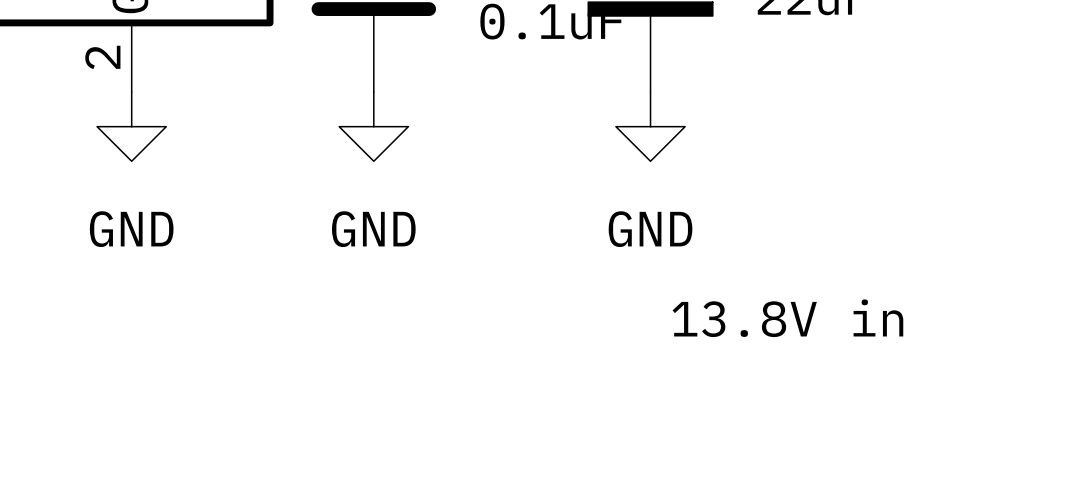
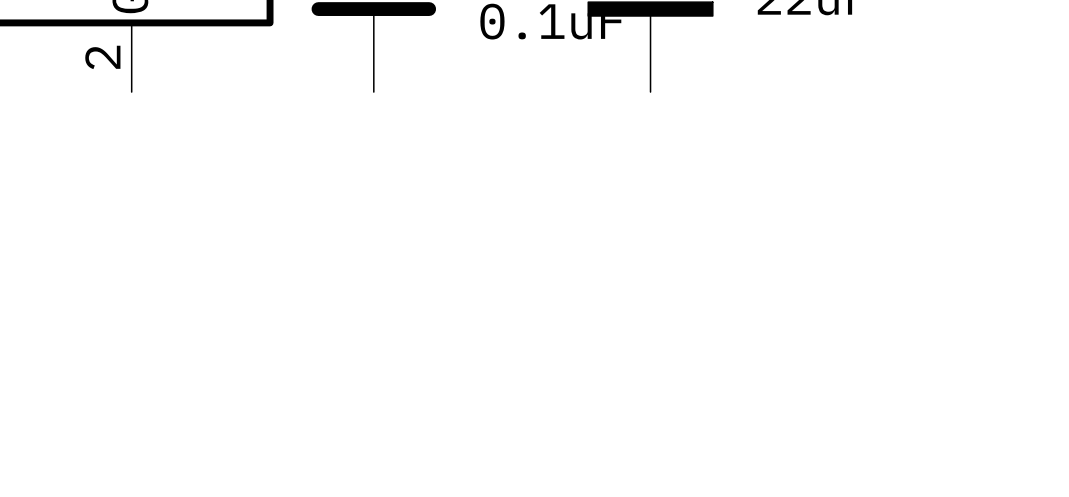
power symbol: GND (131, 126) -> none
power symbol: GND (373, 126) -> none
power symbol: GND (650, 126) -> none
text: 13.8V in (787, 318) -> none

